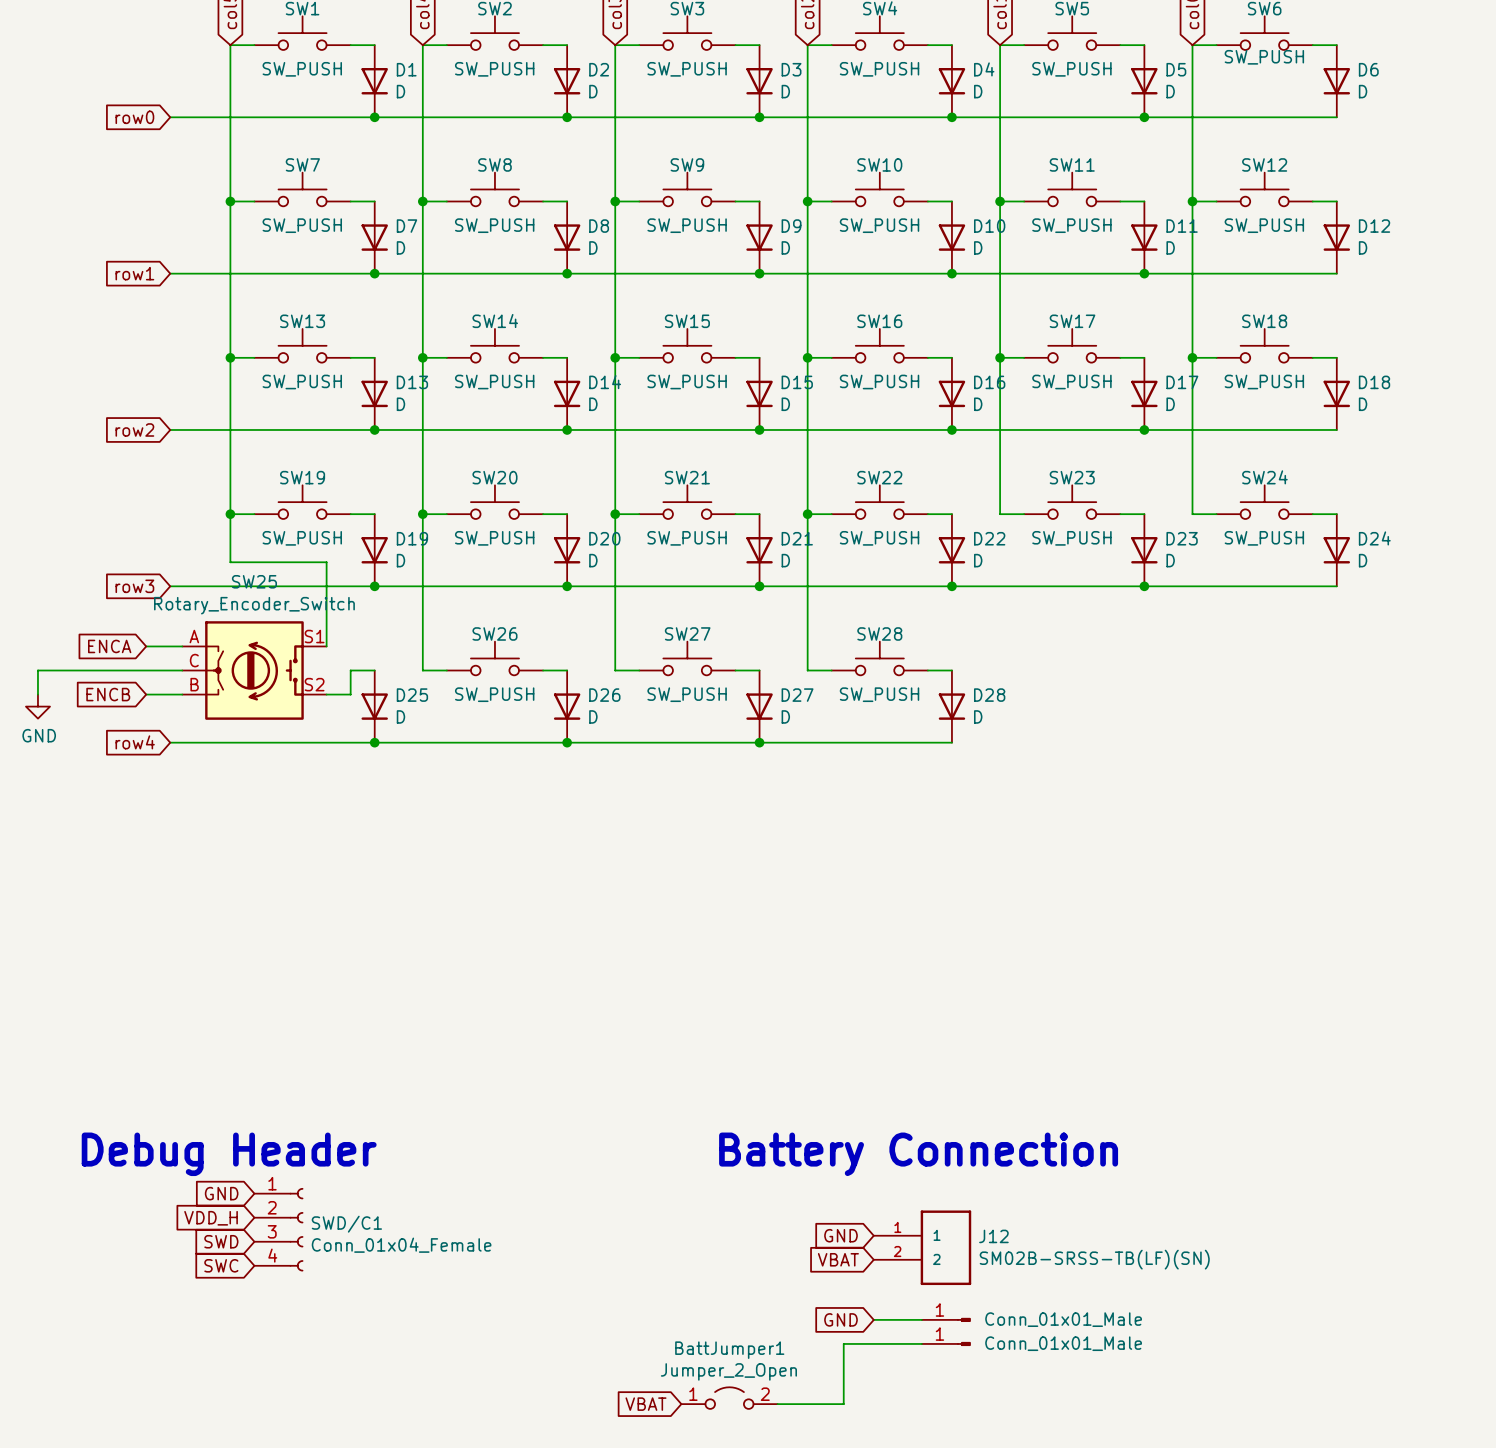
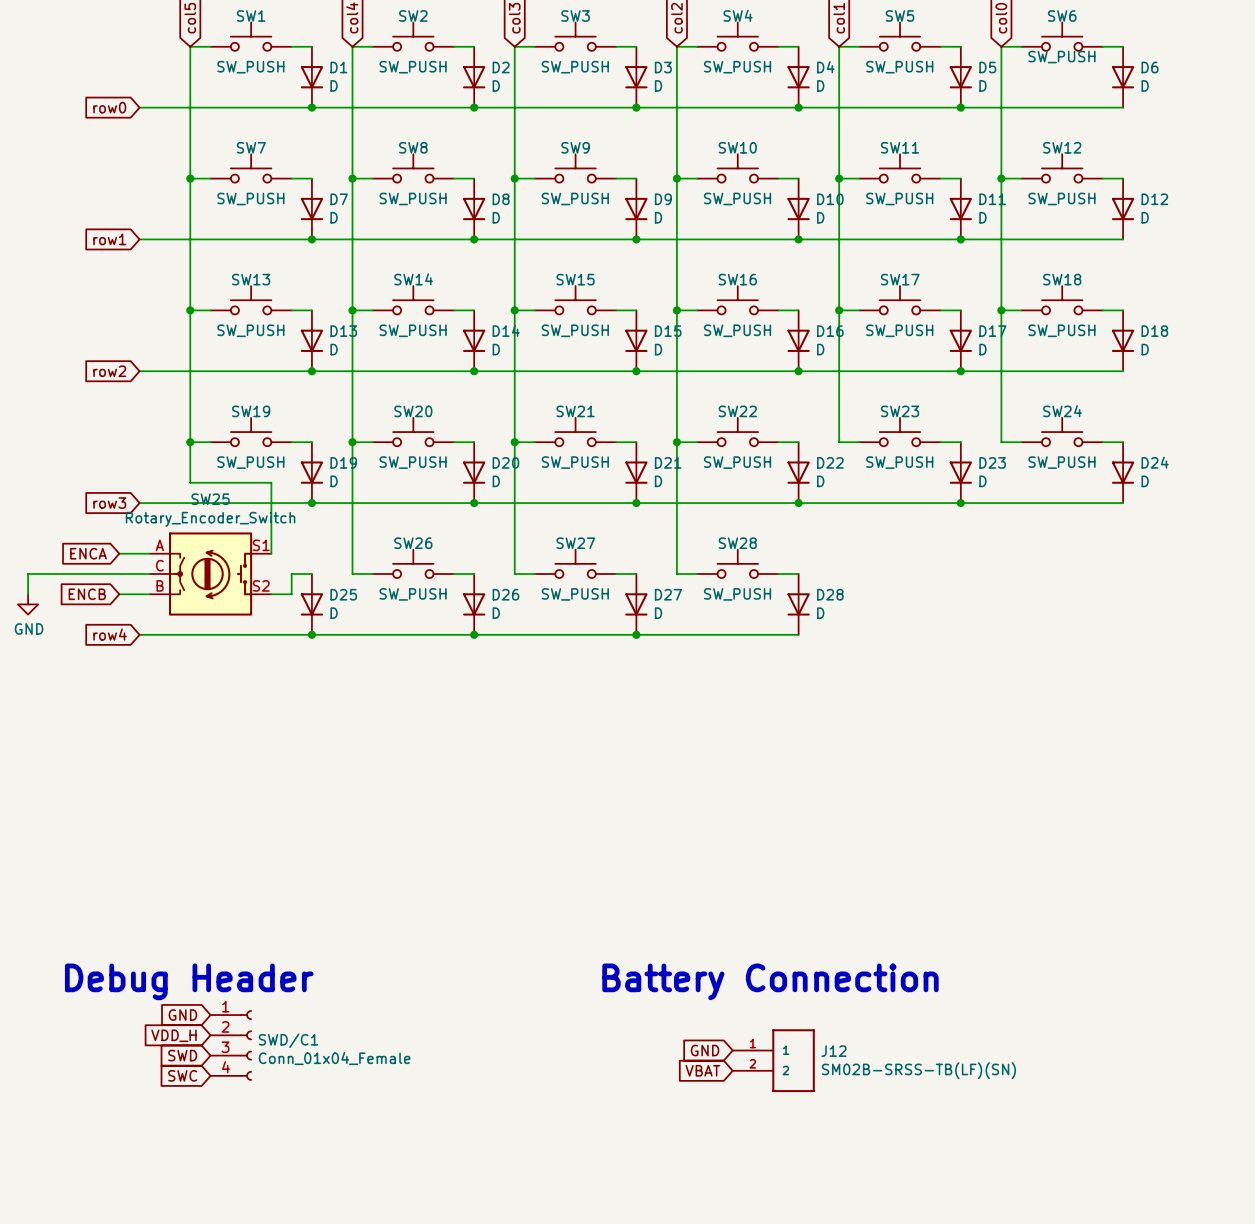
global label: GND (840, 1319) -> none
wire: (873, 1319) (921, 1319) -> none
part: Conn_01x01_Male (946, 1319) -> none
wire: (921, 1343) (843, 1343) (843, 1404) (777, 1404) -> none
part: Conn_01x01_Male (946, 1343) -> none
BattJumper1: Jumper_2_Open (729, 1398) -> none
global label: VBAT (646, 1404) -> none

